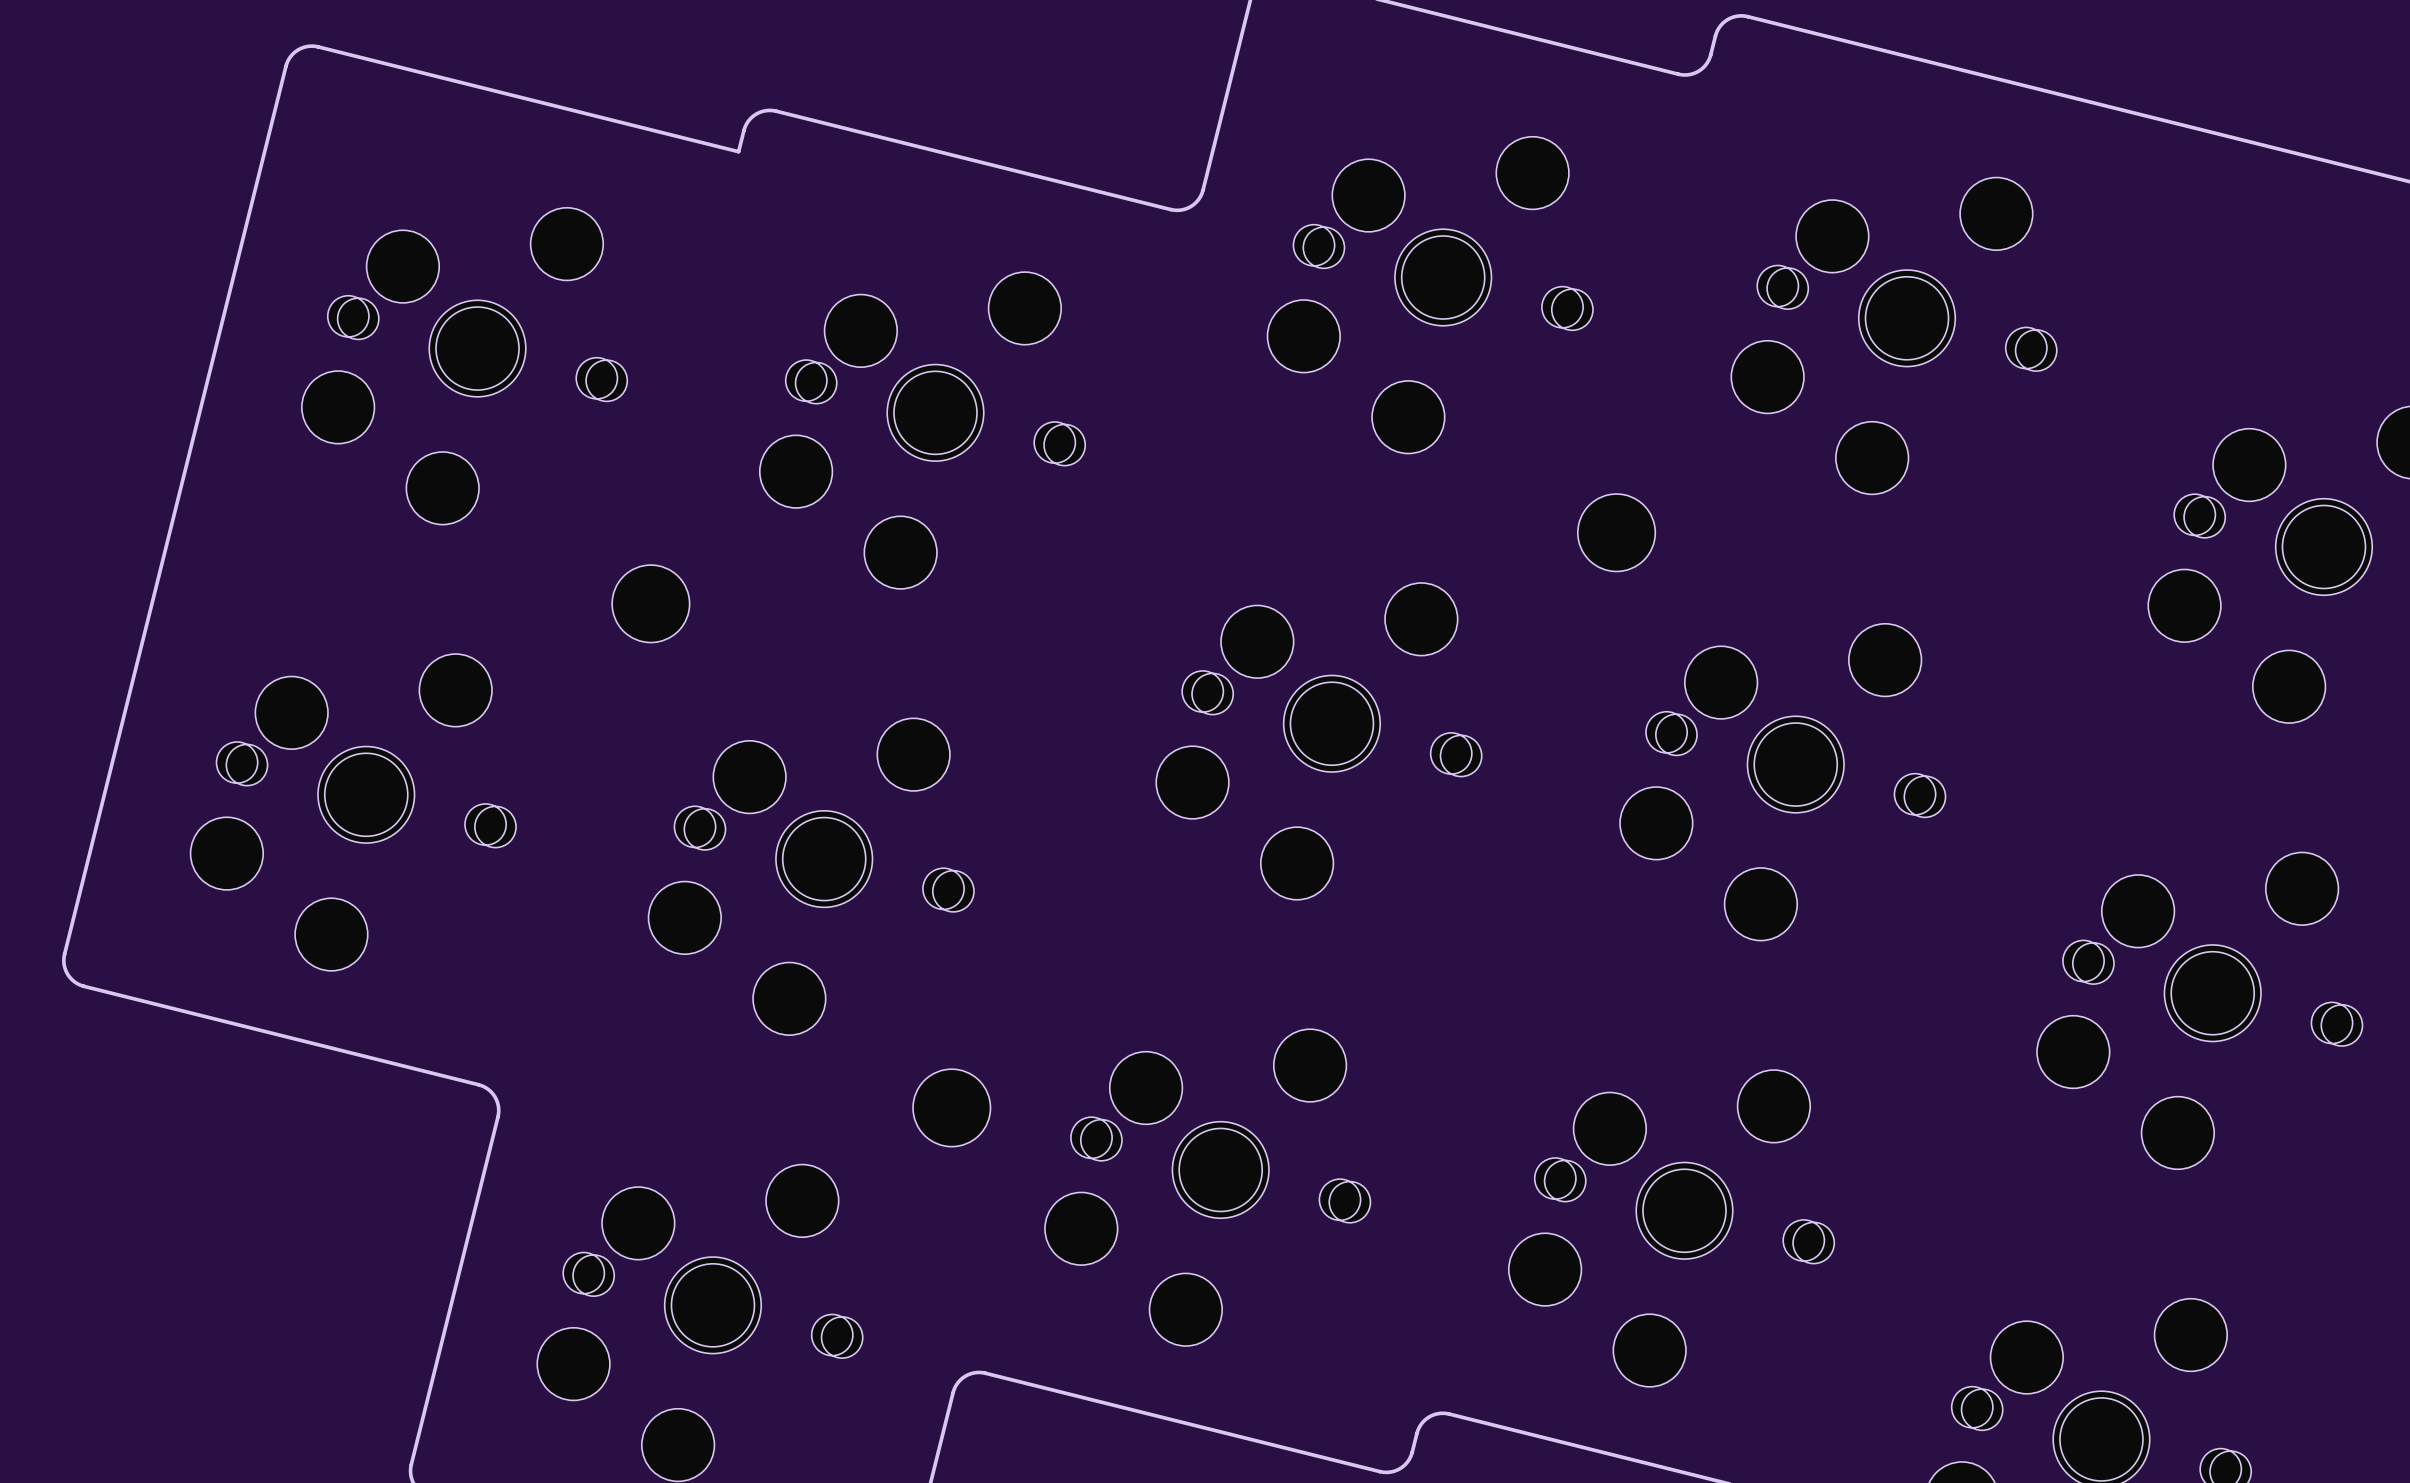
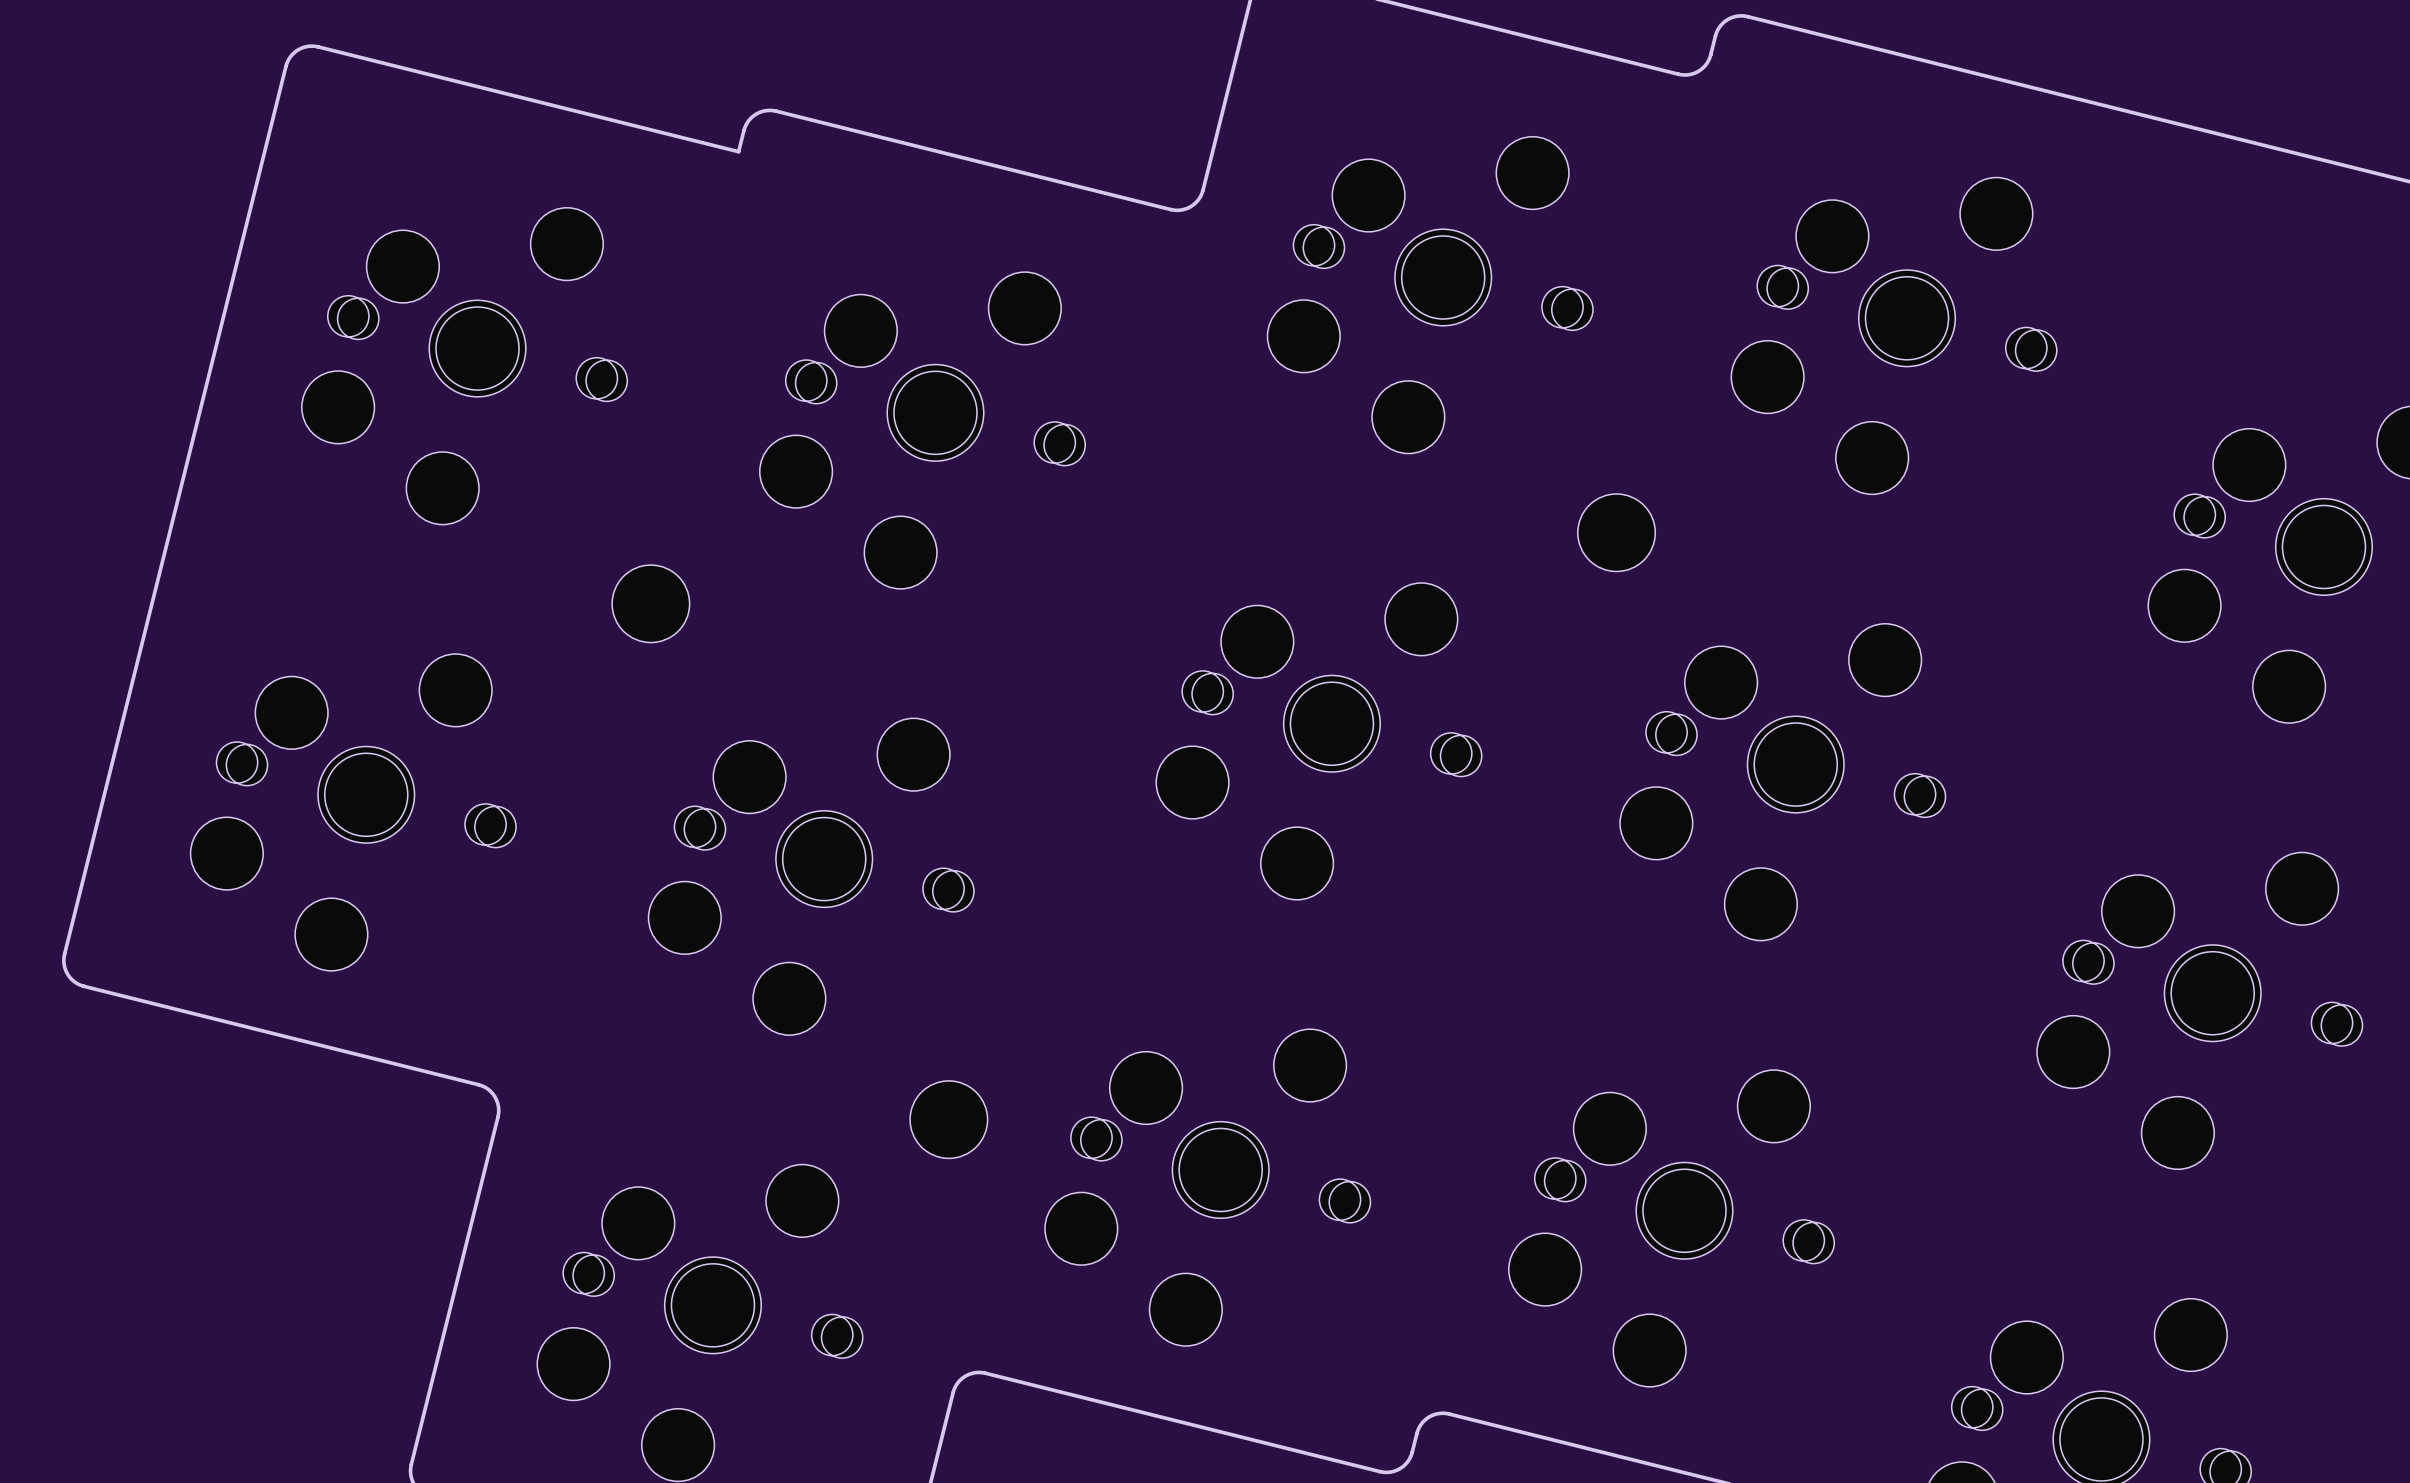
part position: (951, 1107) -> (948, 1119)

